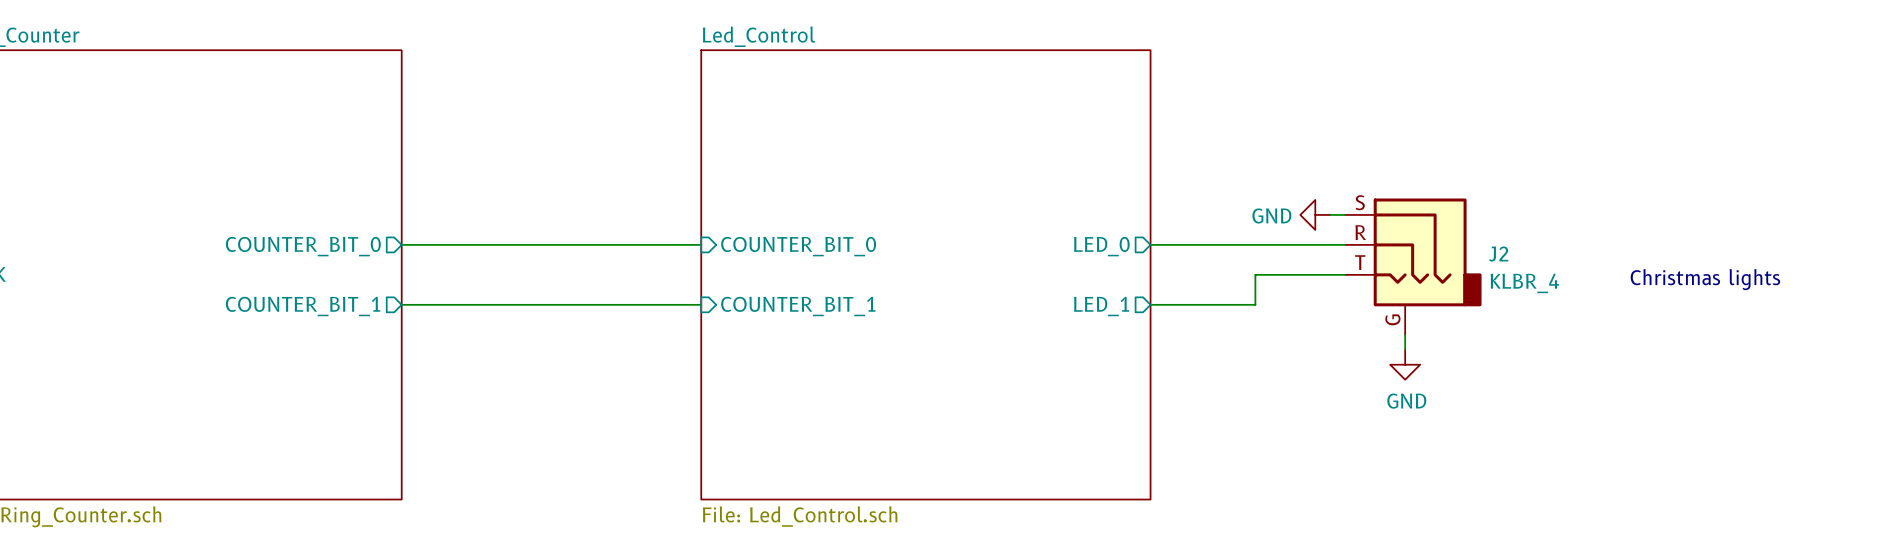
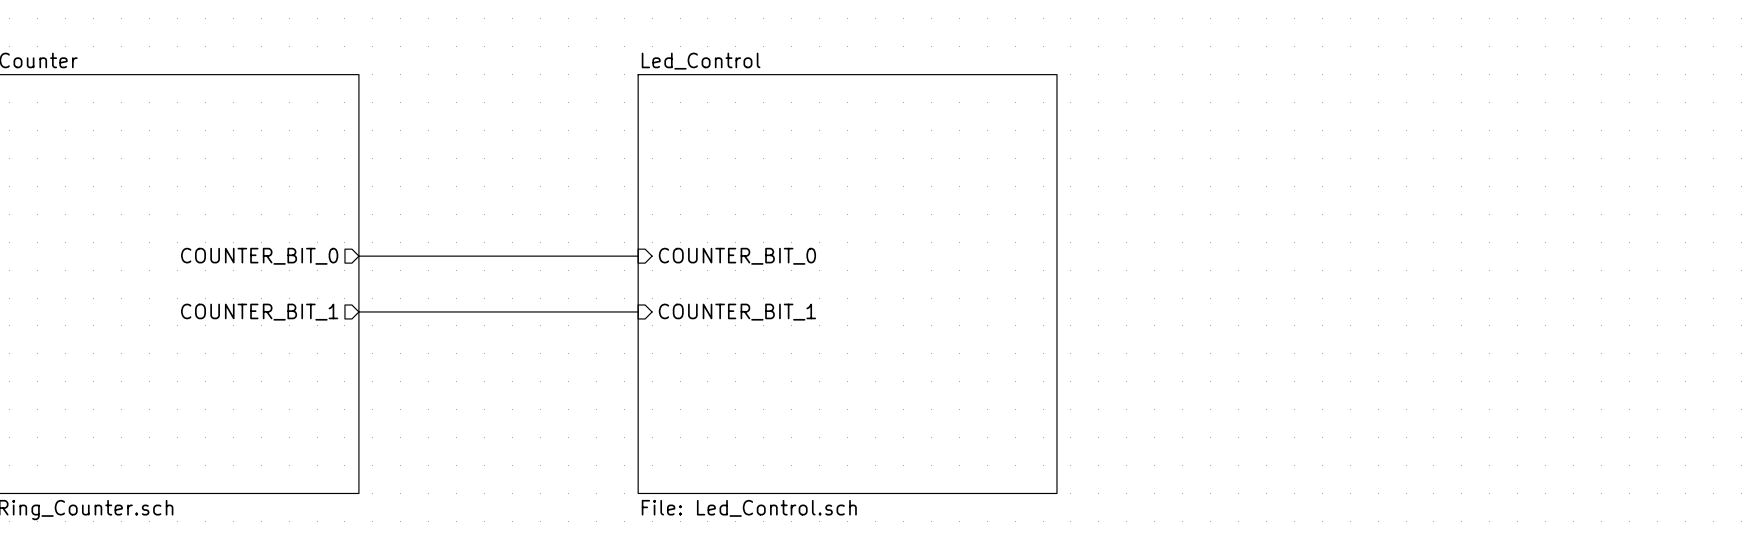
power symbol: GND (1315, 214) -> none
wire: (1330, 214) (1345, 214) -> none
wire: (1150, 244) (1345, 244) -> none
sheet pin: LED_0 (1101, 246) -> none
J2: KLBR_4 (1413, 266) -> none
wire: (1345, 274) (1255, 274) (1255, 304) (1150, 304) -> none
text: Christmas lights (1705, 279) -> none
sheet pin: LED_1 (1101, 306) -> none
wire: (1405, 334) (1405, 349) -> none
power symbol: GND (1405, 364) -> none

